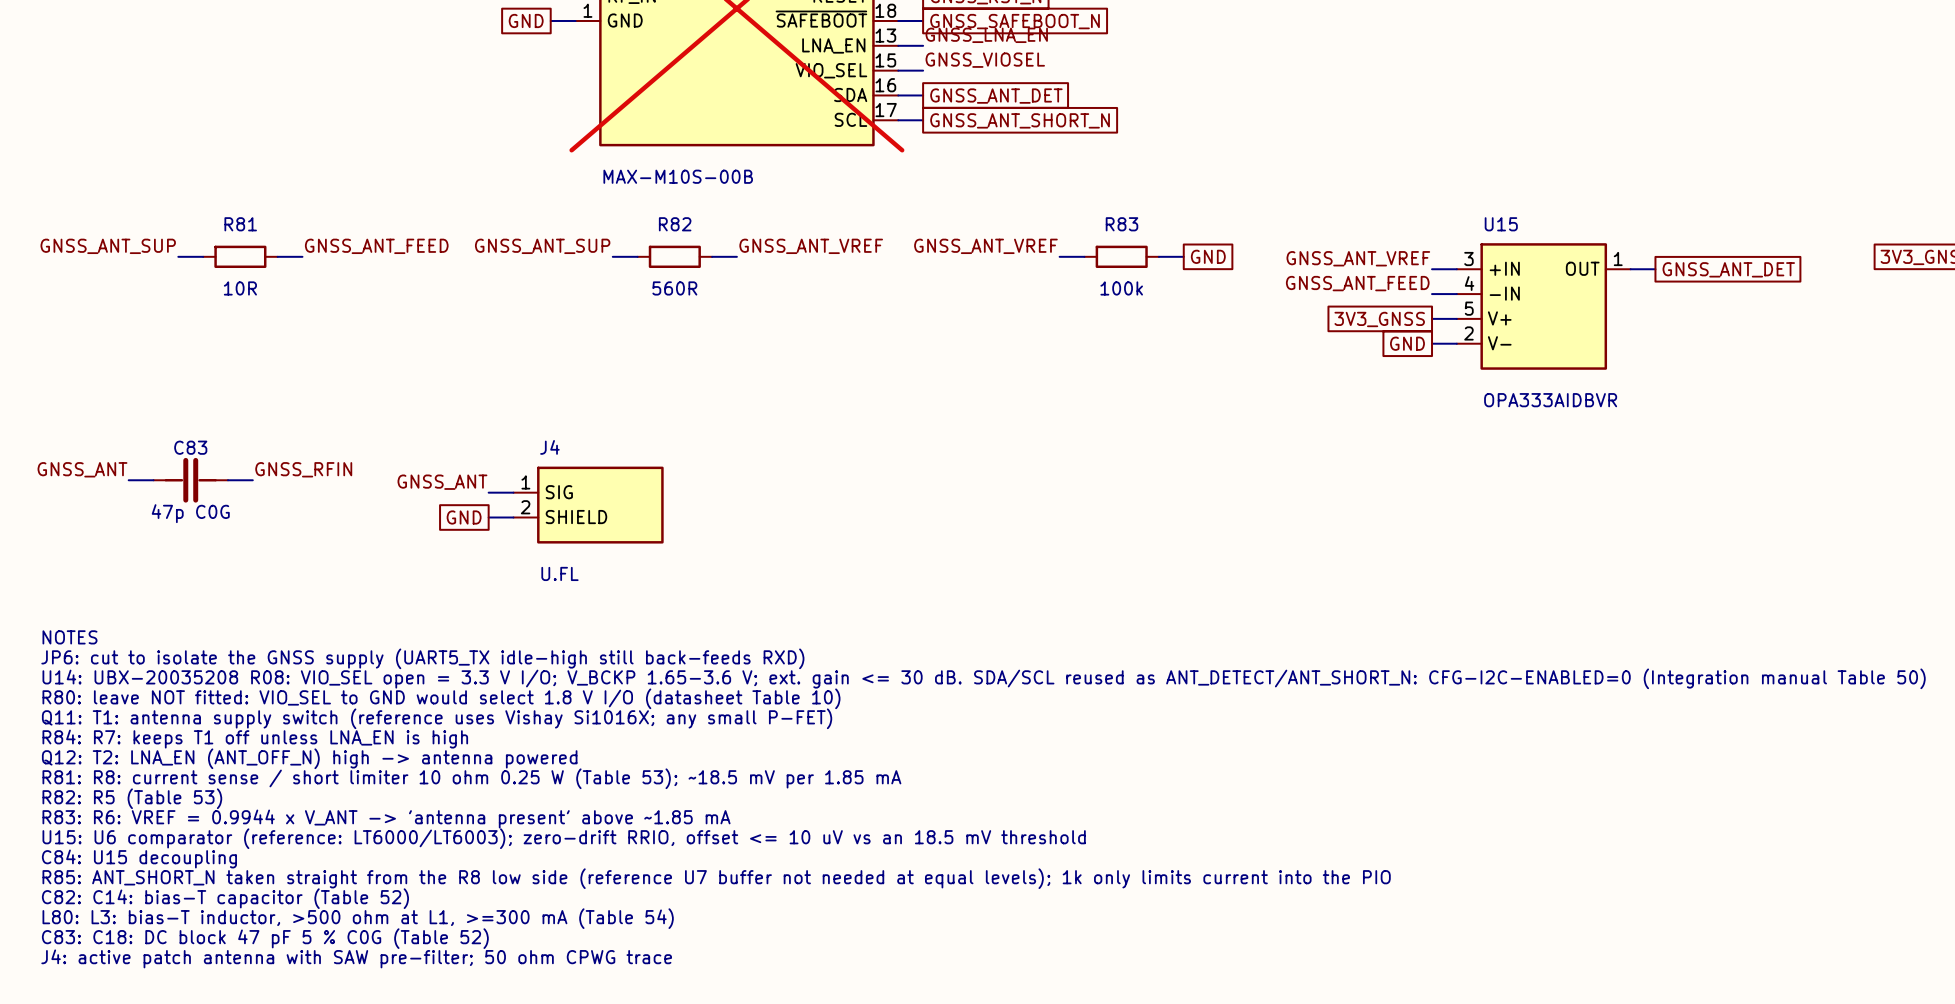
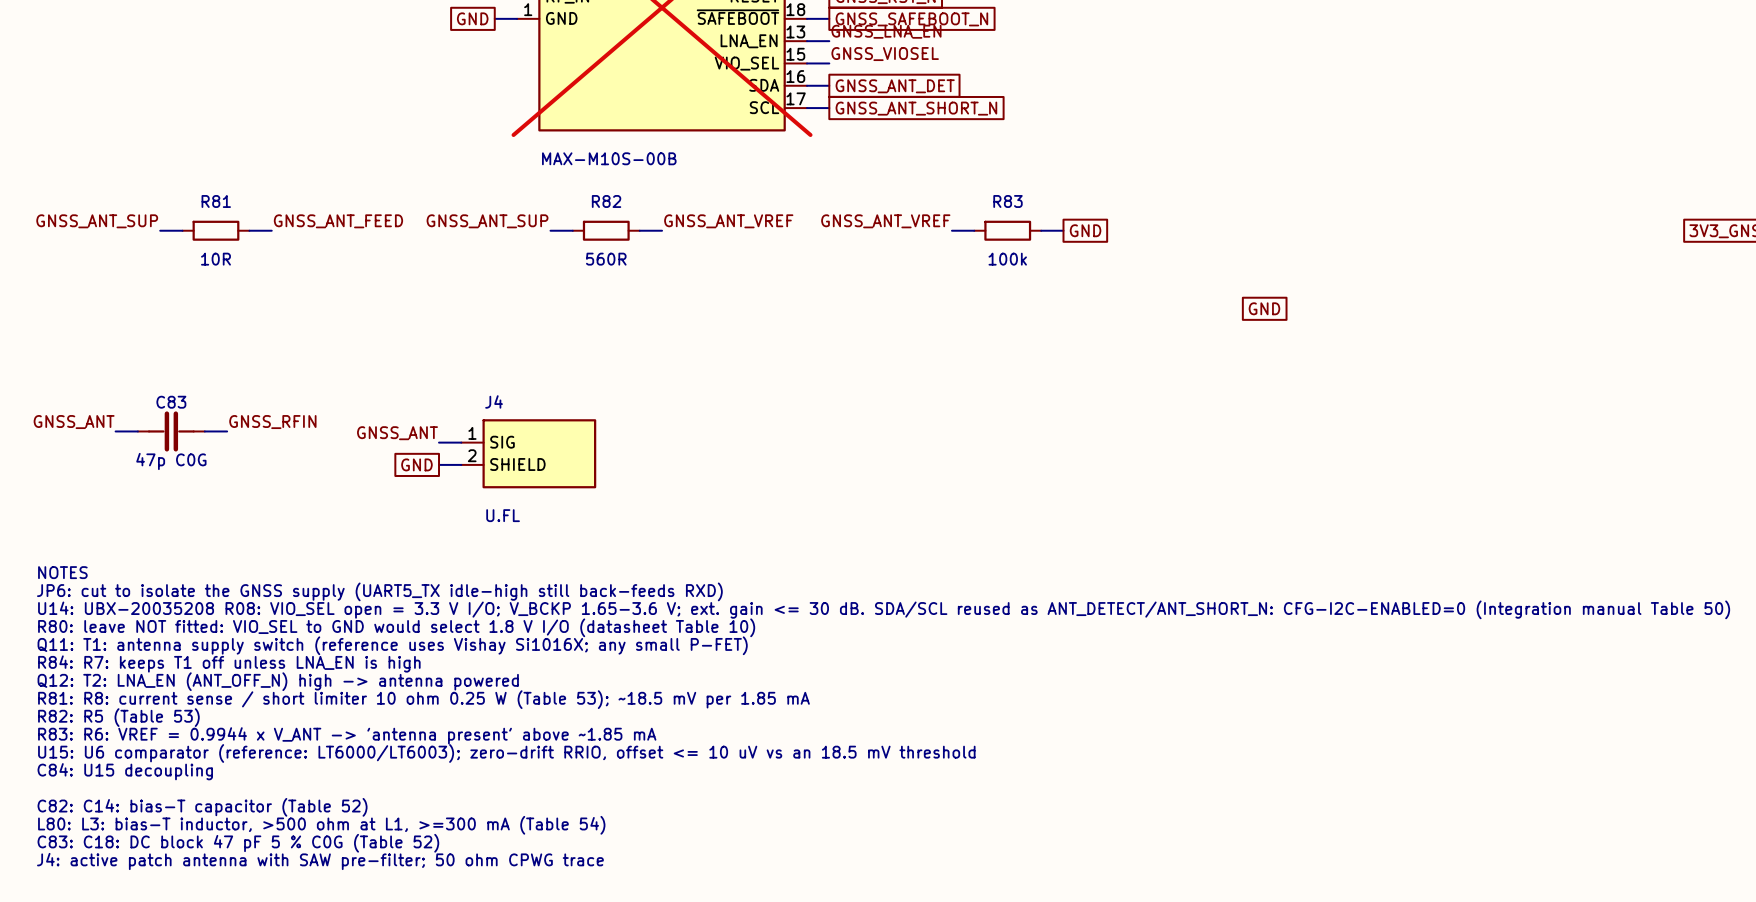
label: GNSS_ANT_VREF (1358, 258) -> none
wire: (1432, 269) (1456, 269) -> none
wire: (1630, 269) (1655, 269) -> none
global label: GNSS_ANT_DET (1728, 269) -> none
label: GNSS_ANT_FEED (1357, 283) -> none
wire: (1432, 294) (1456, 294) -> none
U15: OPA333AIDBVR (1543, 306) -> none
wire: (1432, 318) (1456, 318) -> none
global label: 3V3_GNSS (1379, 319) -> none
wire: (1432, 343) (1456, 343) -> none
text: R85: ANT_SHORT_N taken straight from the R8 low side (reference U7 buffer not needed at equal levels); 1k only limits current into the PIO (716, 878) -> none

